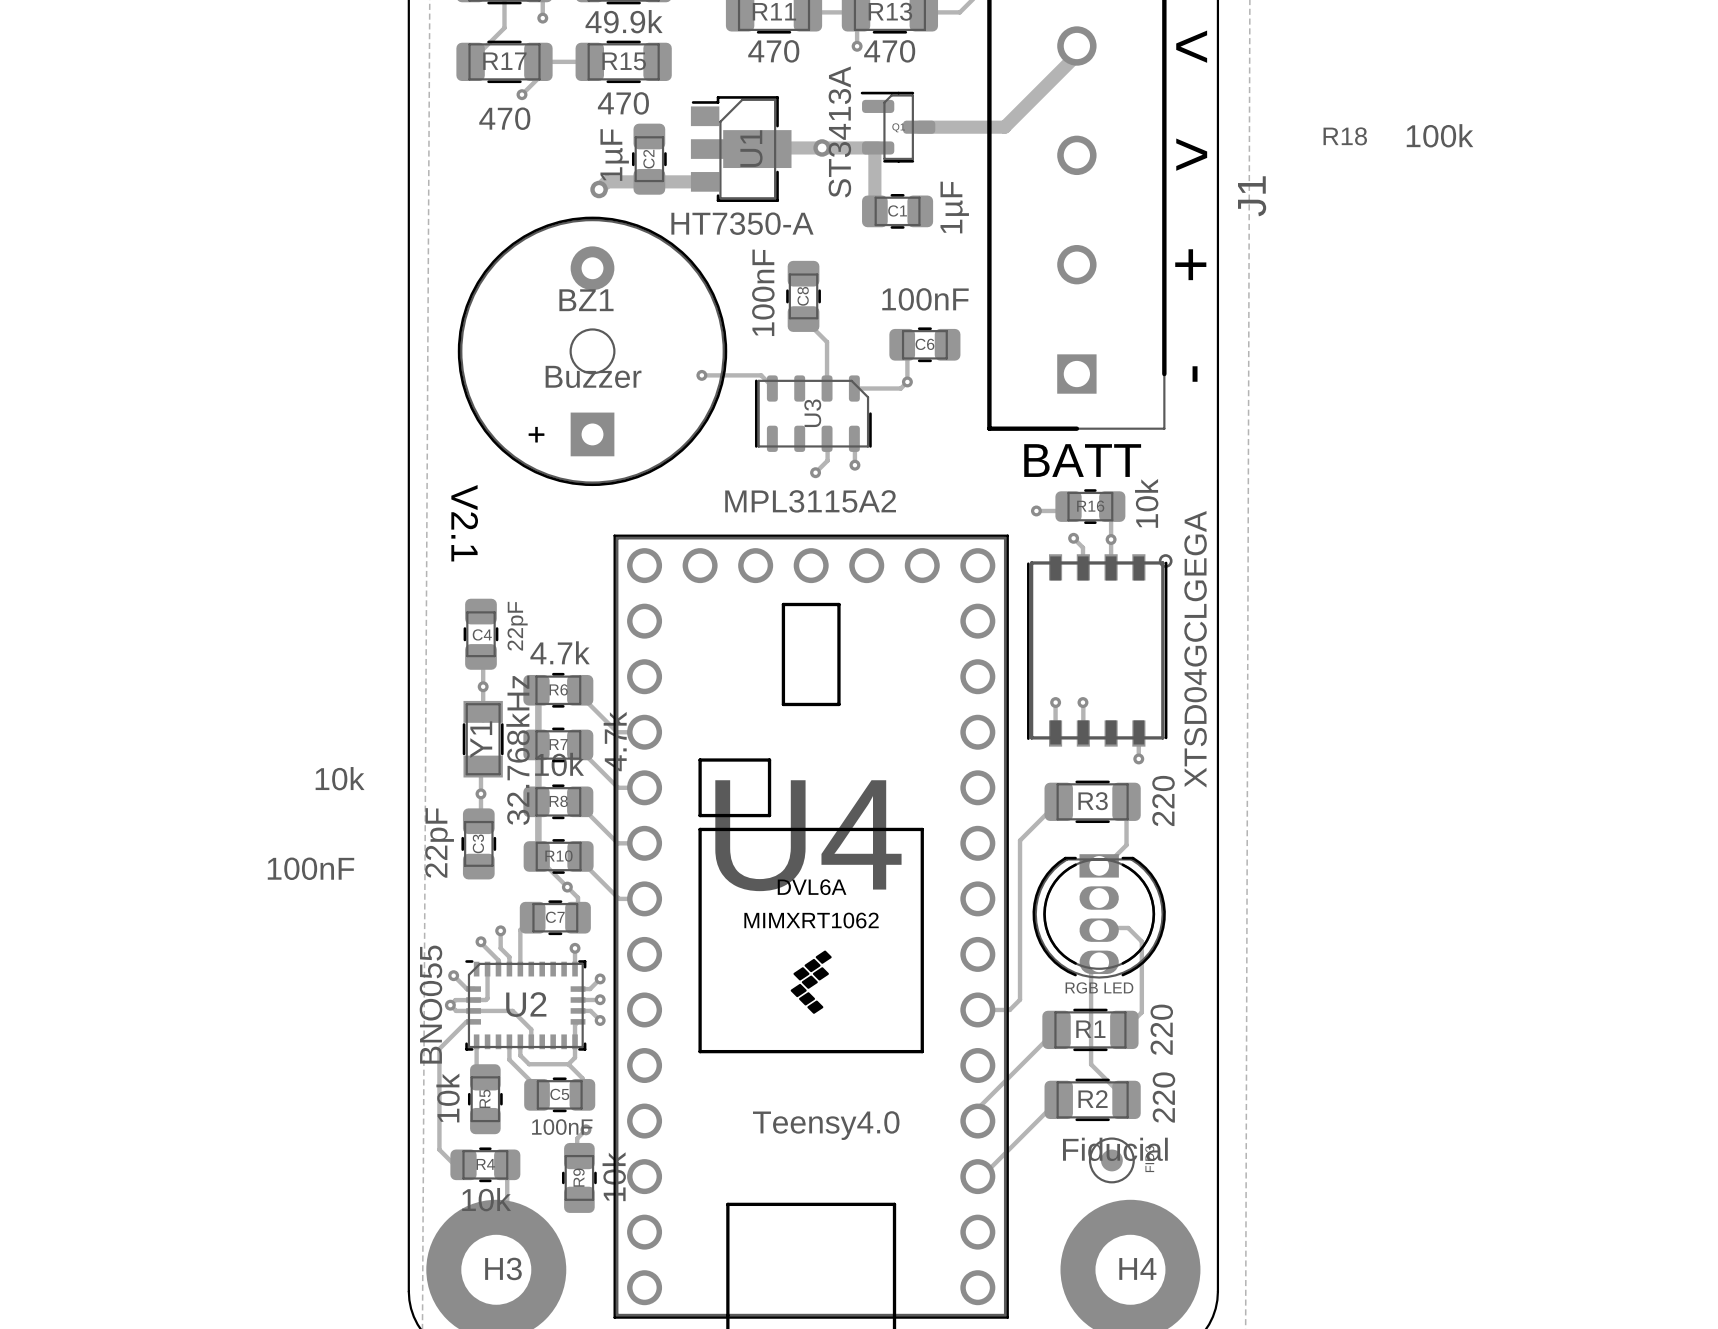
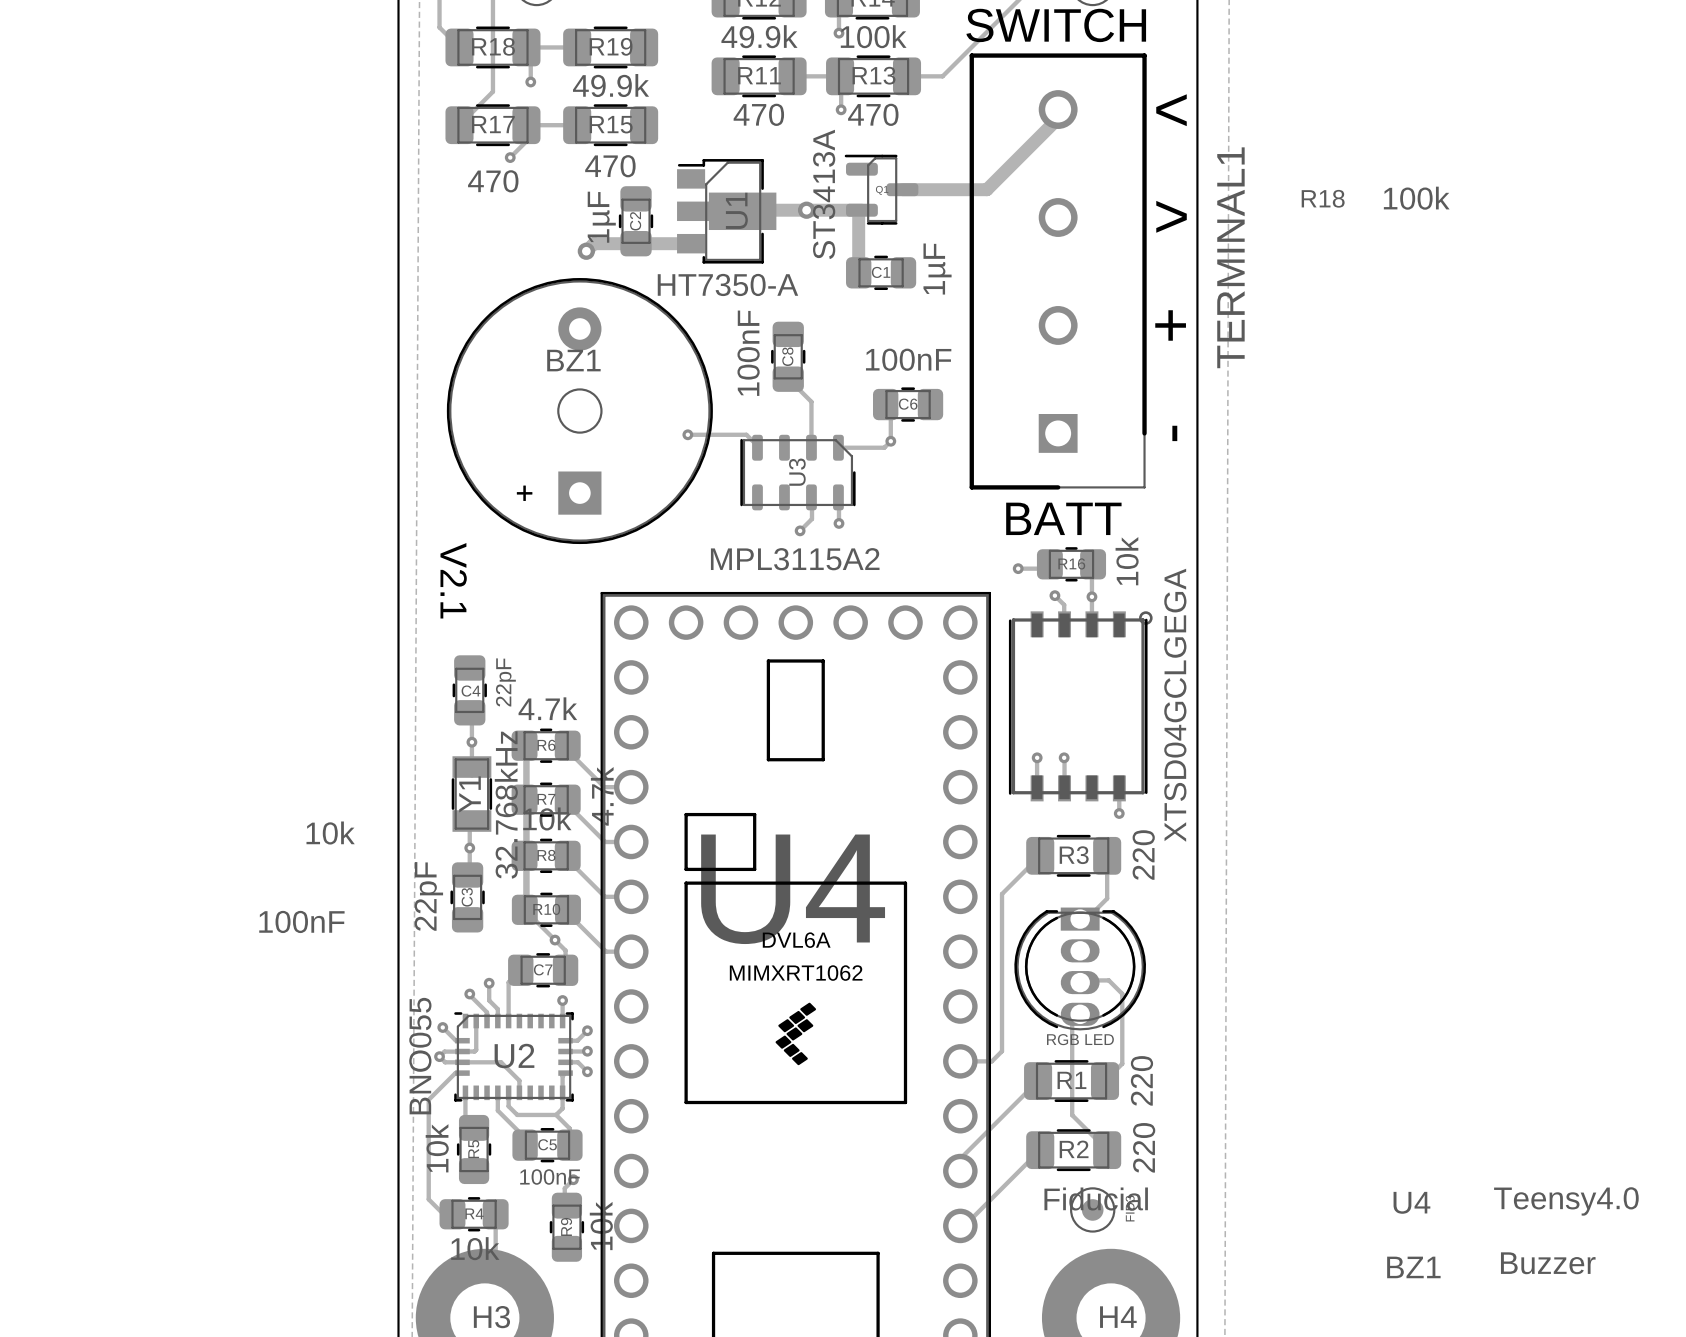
J1 name: J1 (1252, 196) -> TERMINAL1 (1230, 257)
BZ1 value position: Buzzer (593, 376) -> Buzzer (1548, 1263)
U4 value position: Teensy4.0 (826, 1125) -> Teensy4.0 (1566, 1201)
text: none -> U4 (1411, 1202)
text: none -> BZ1 (1413, 1267)

